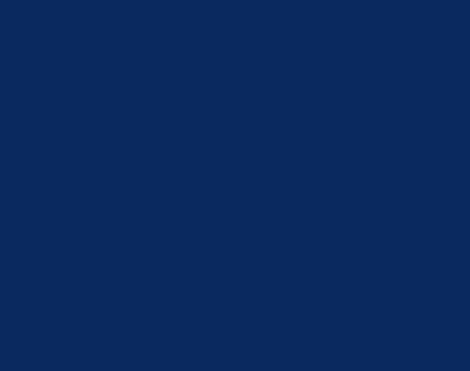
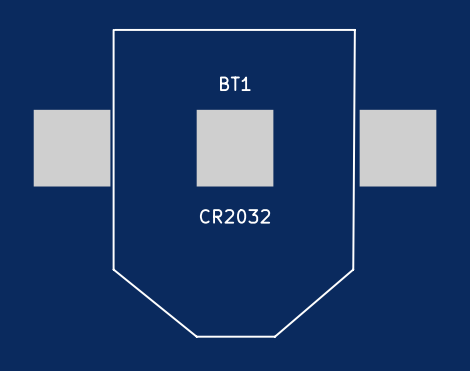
BT1: none -> CR2032 (235, 183)

